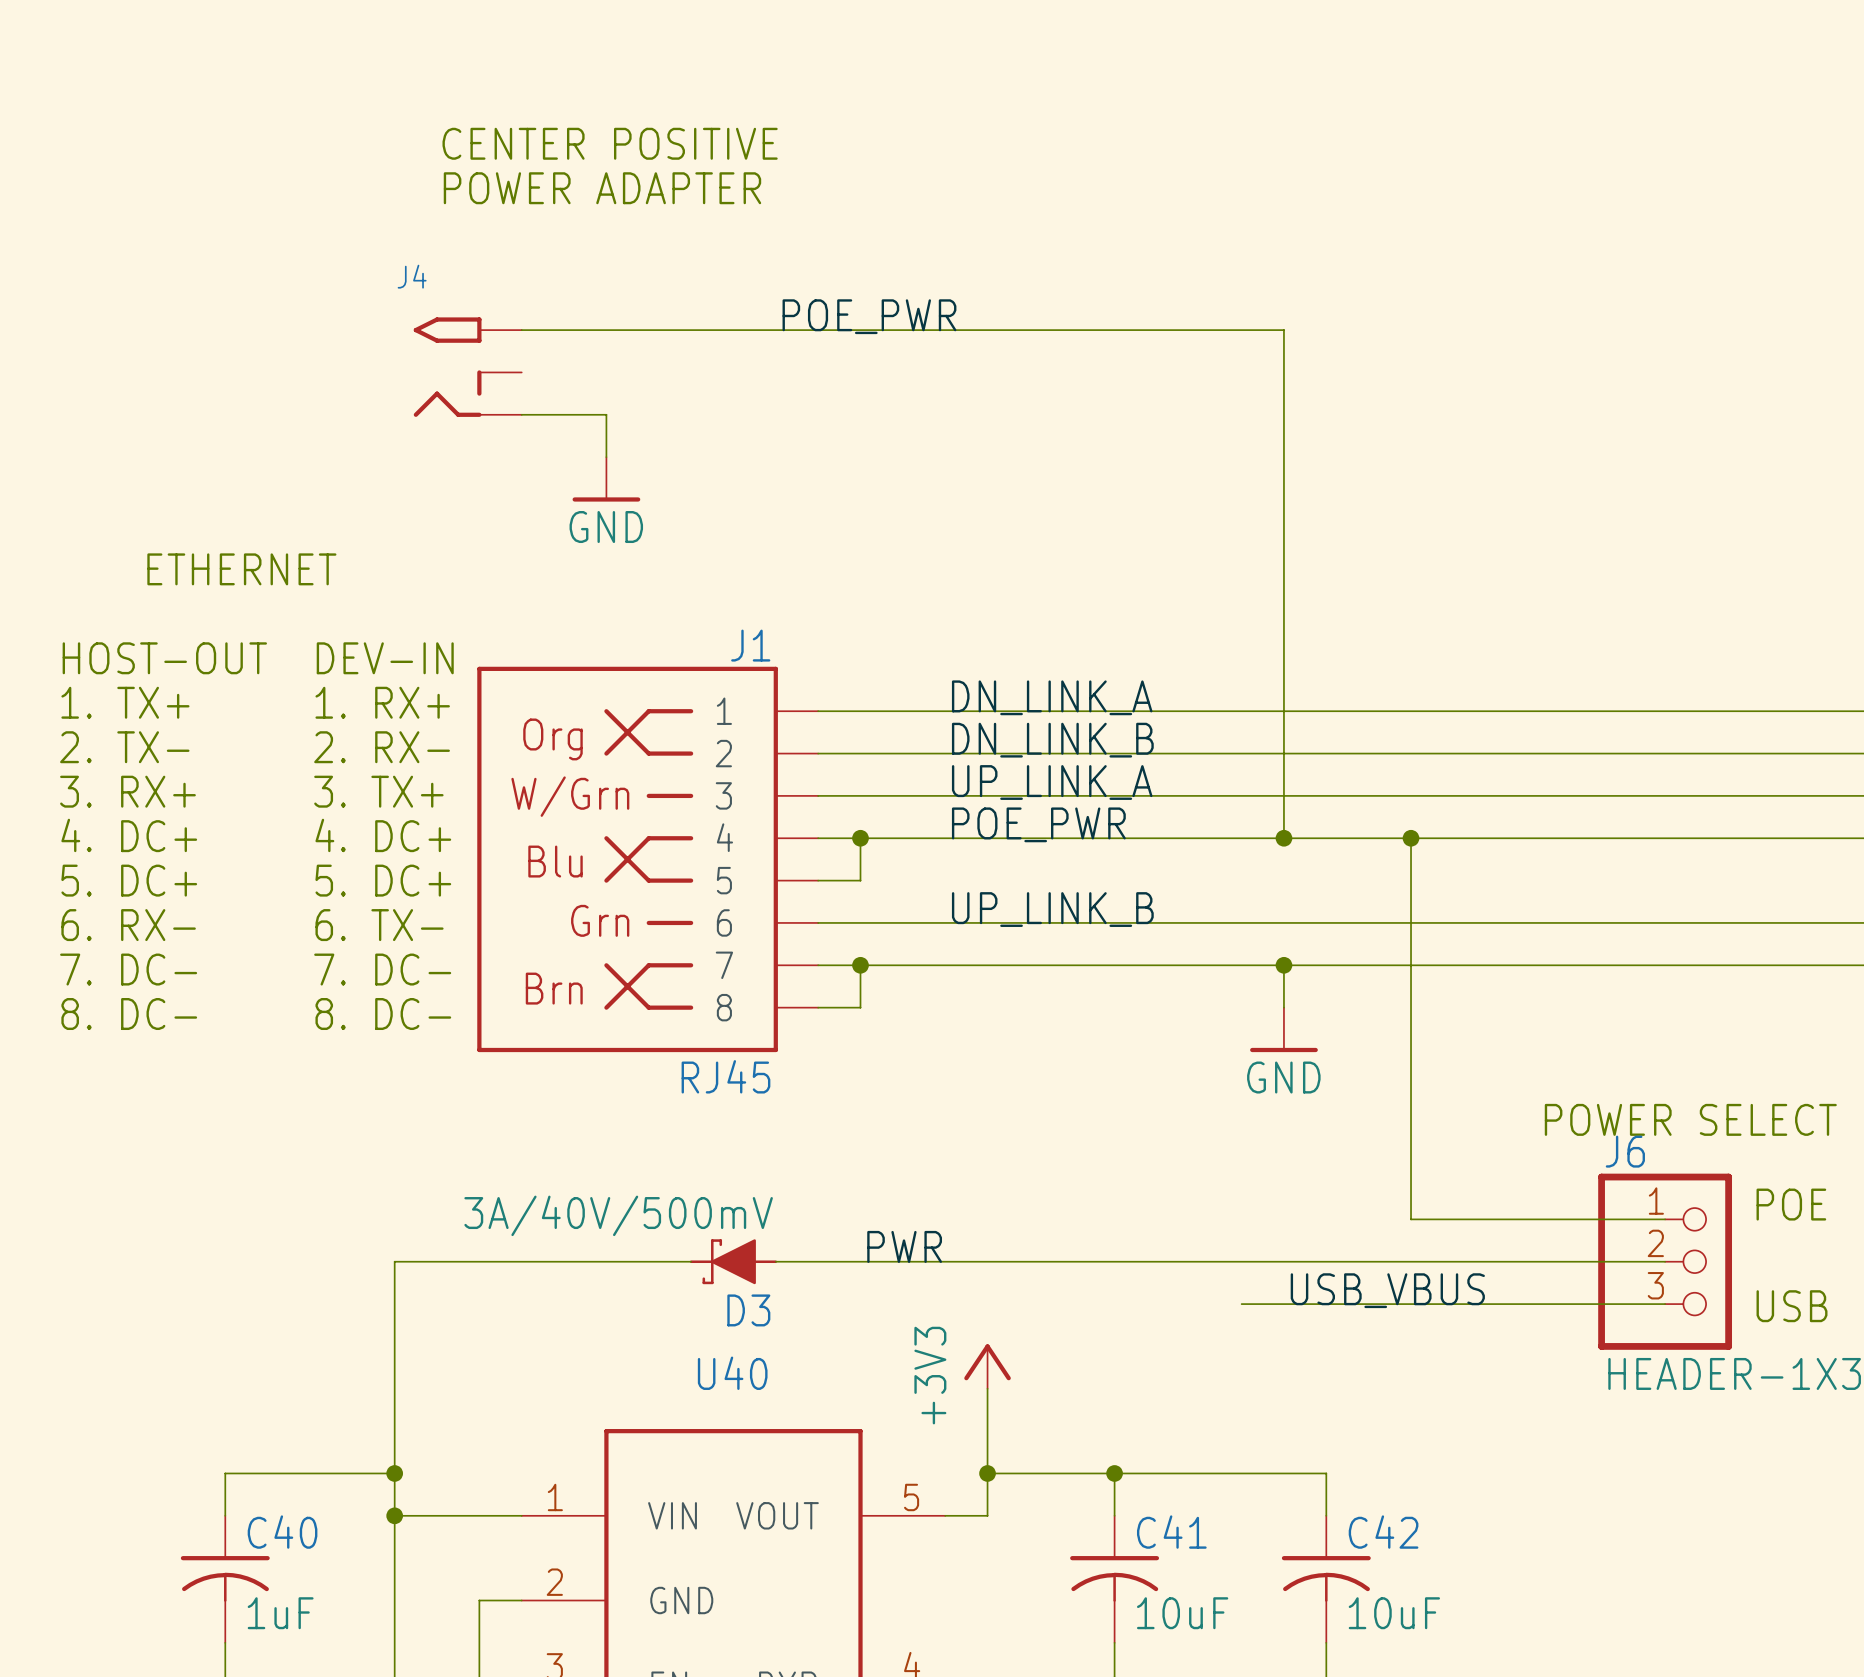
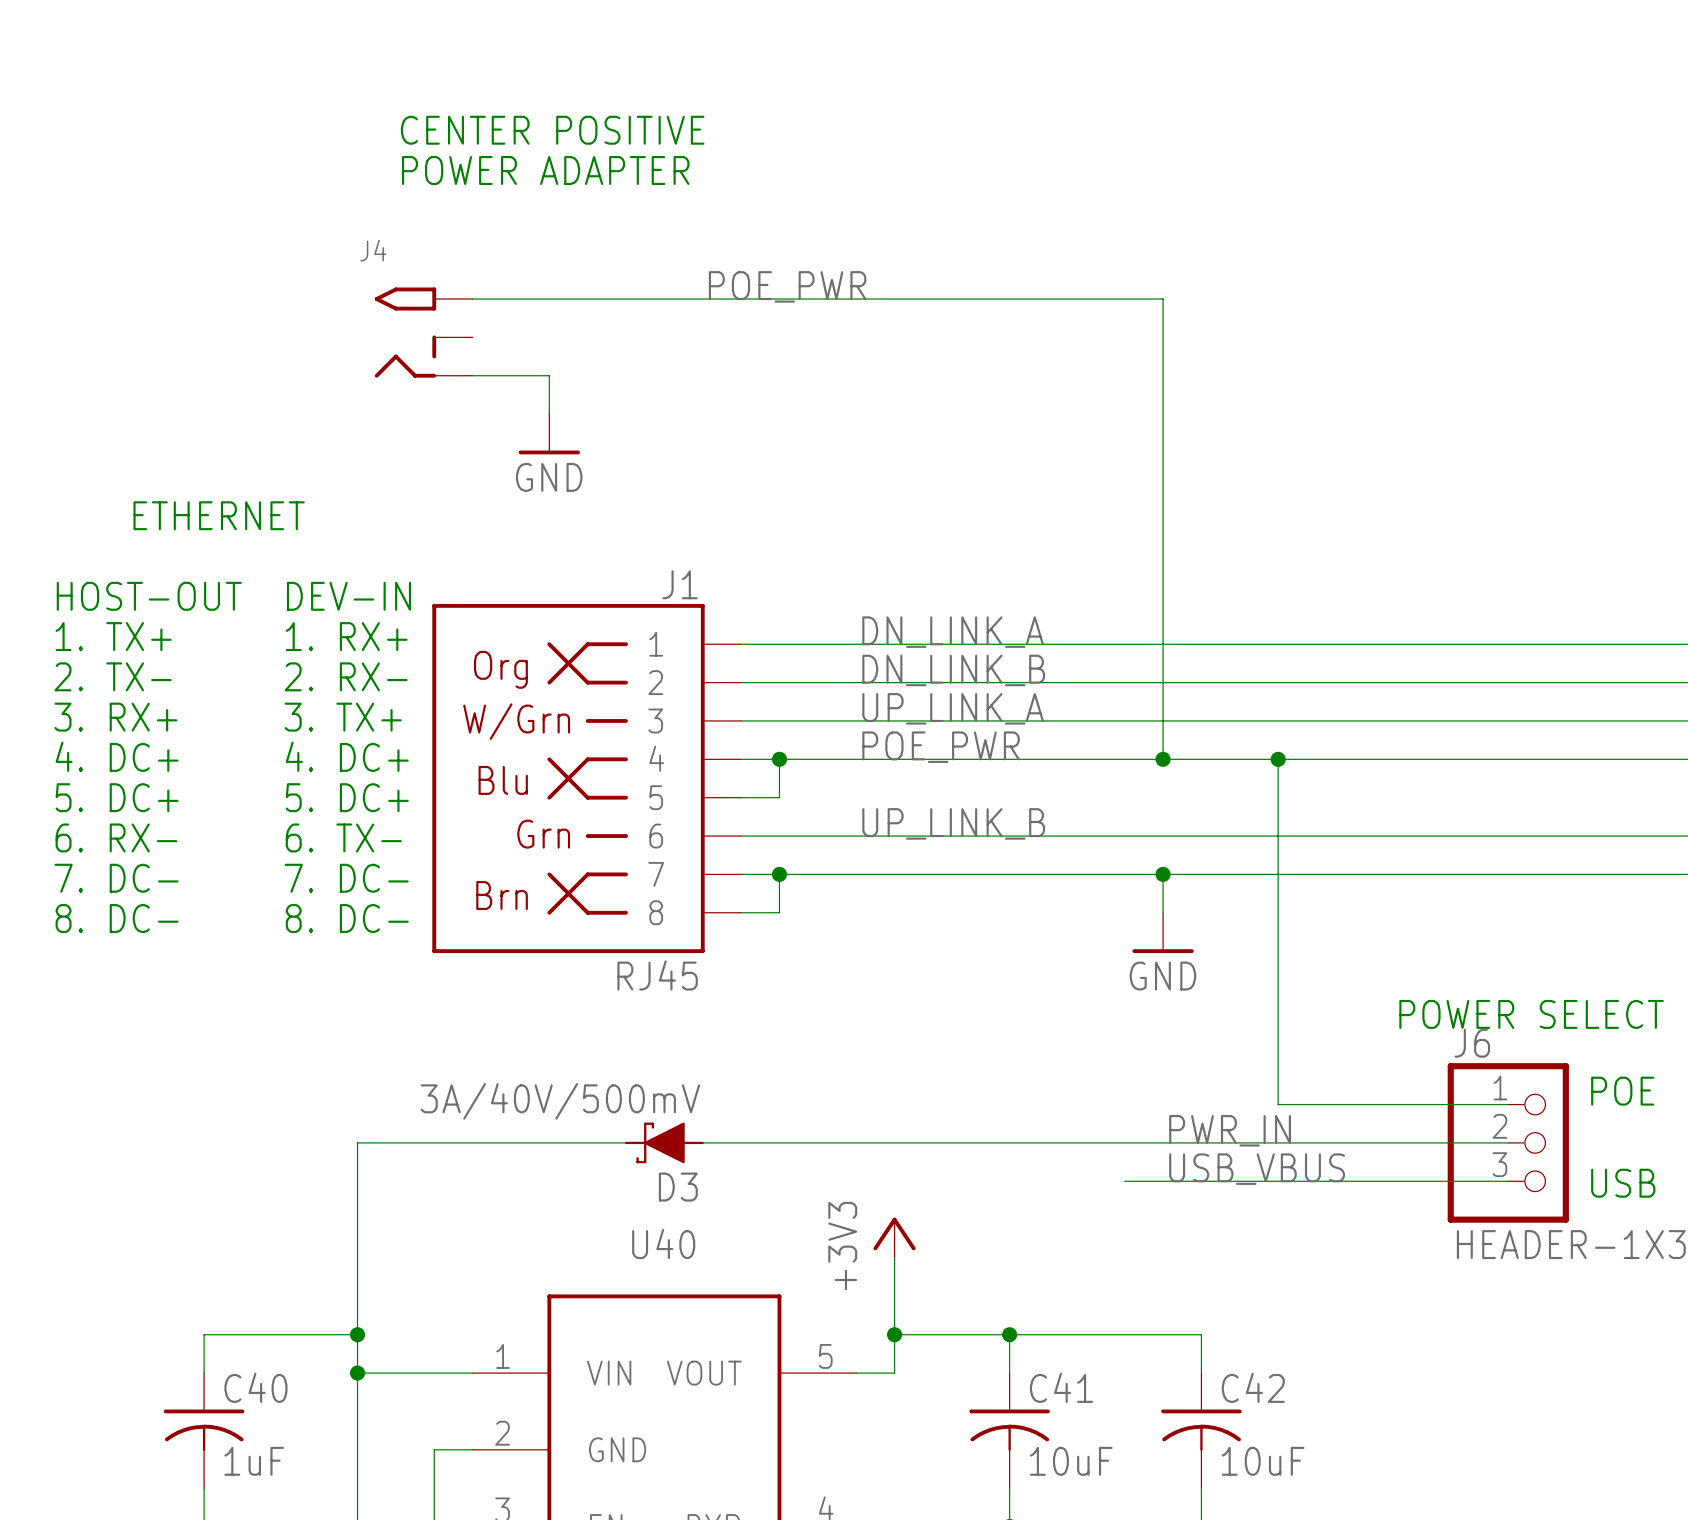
label: PWR (904, 1246) -> none
label: none -> PWR_IN (1230, 1130)

